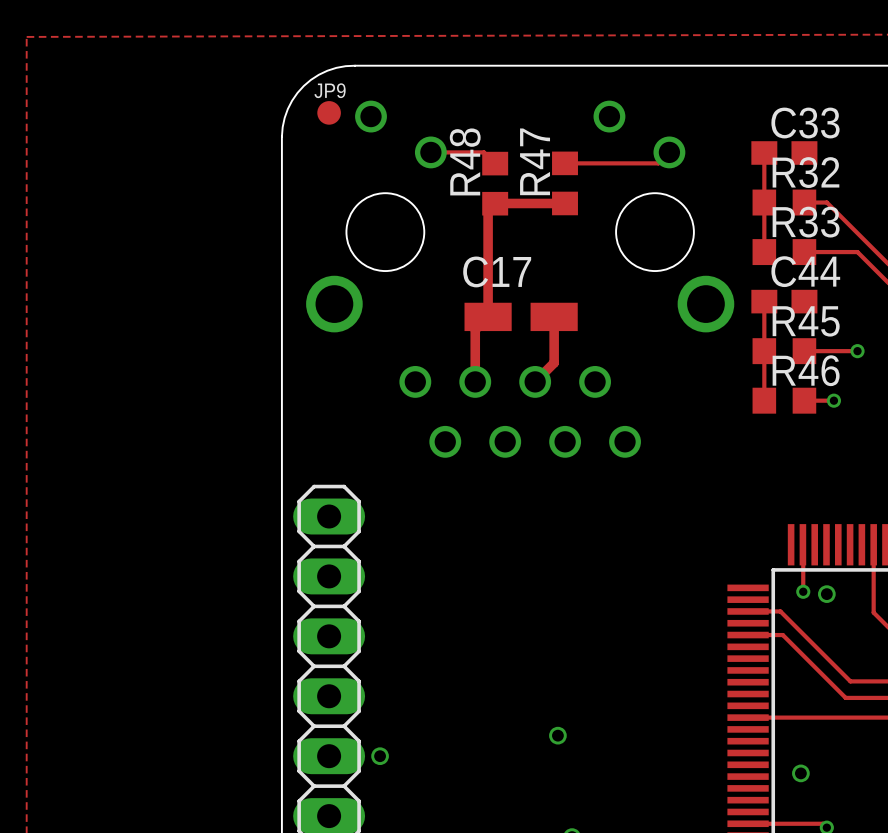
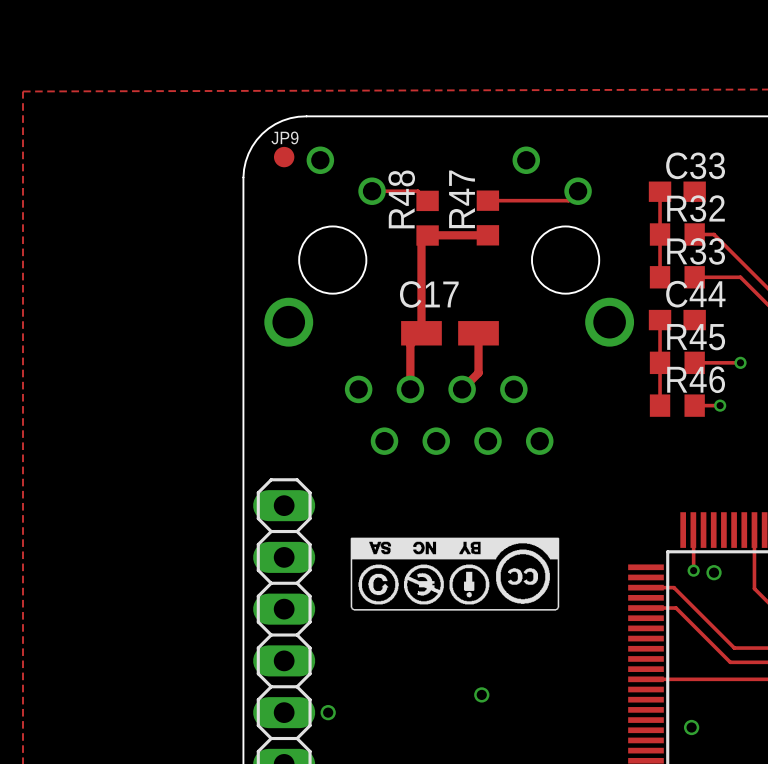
drawing: none -> [350, 537, 560, 611]

